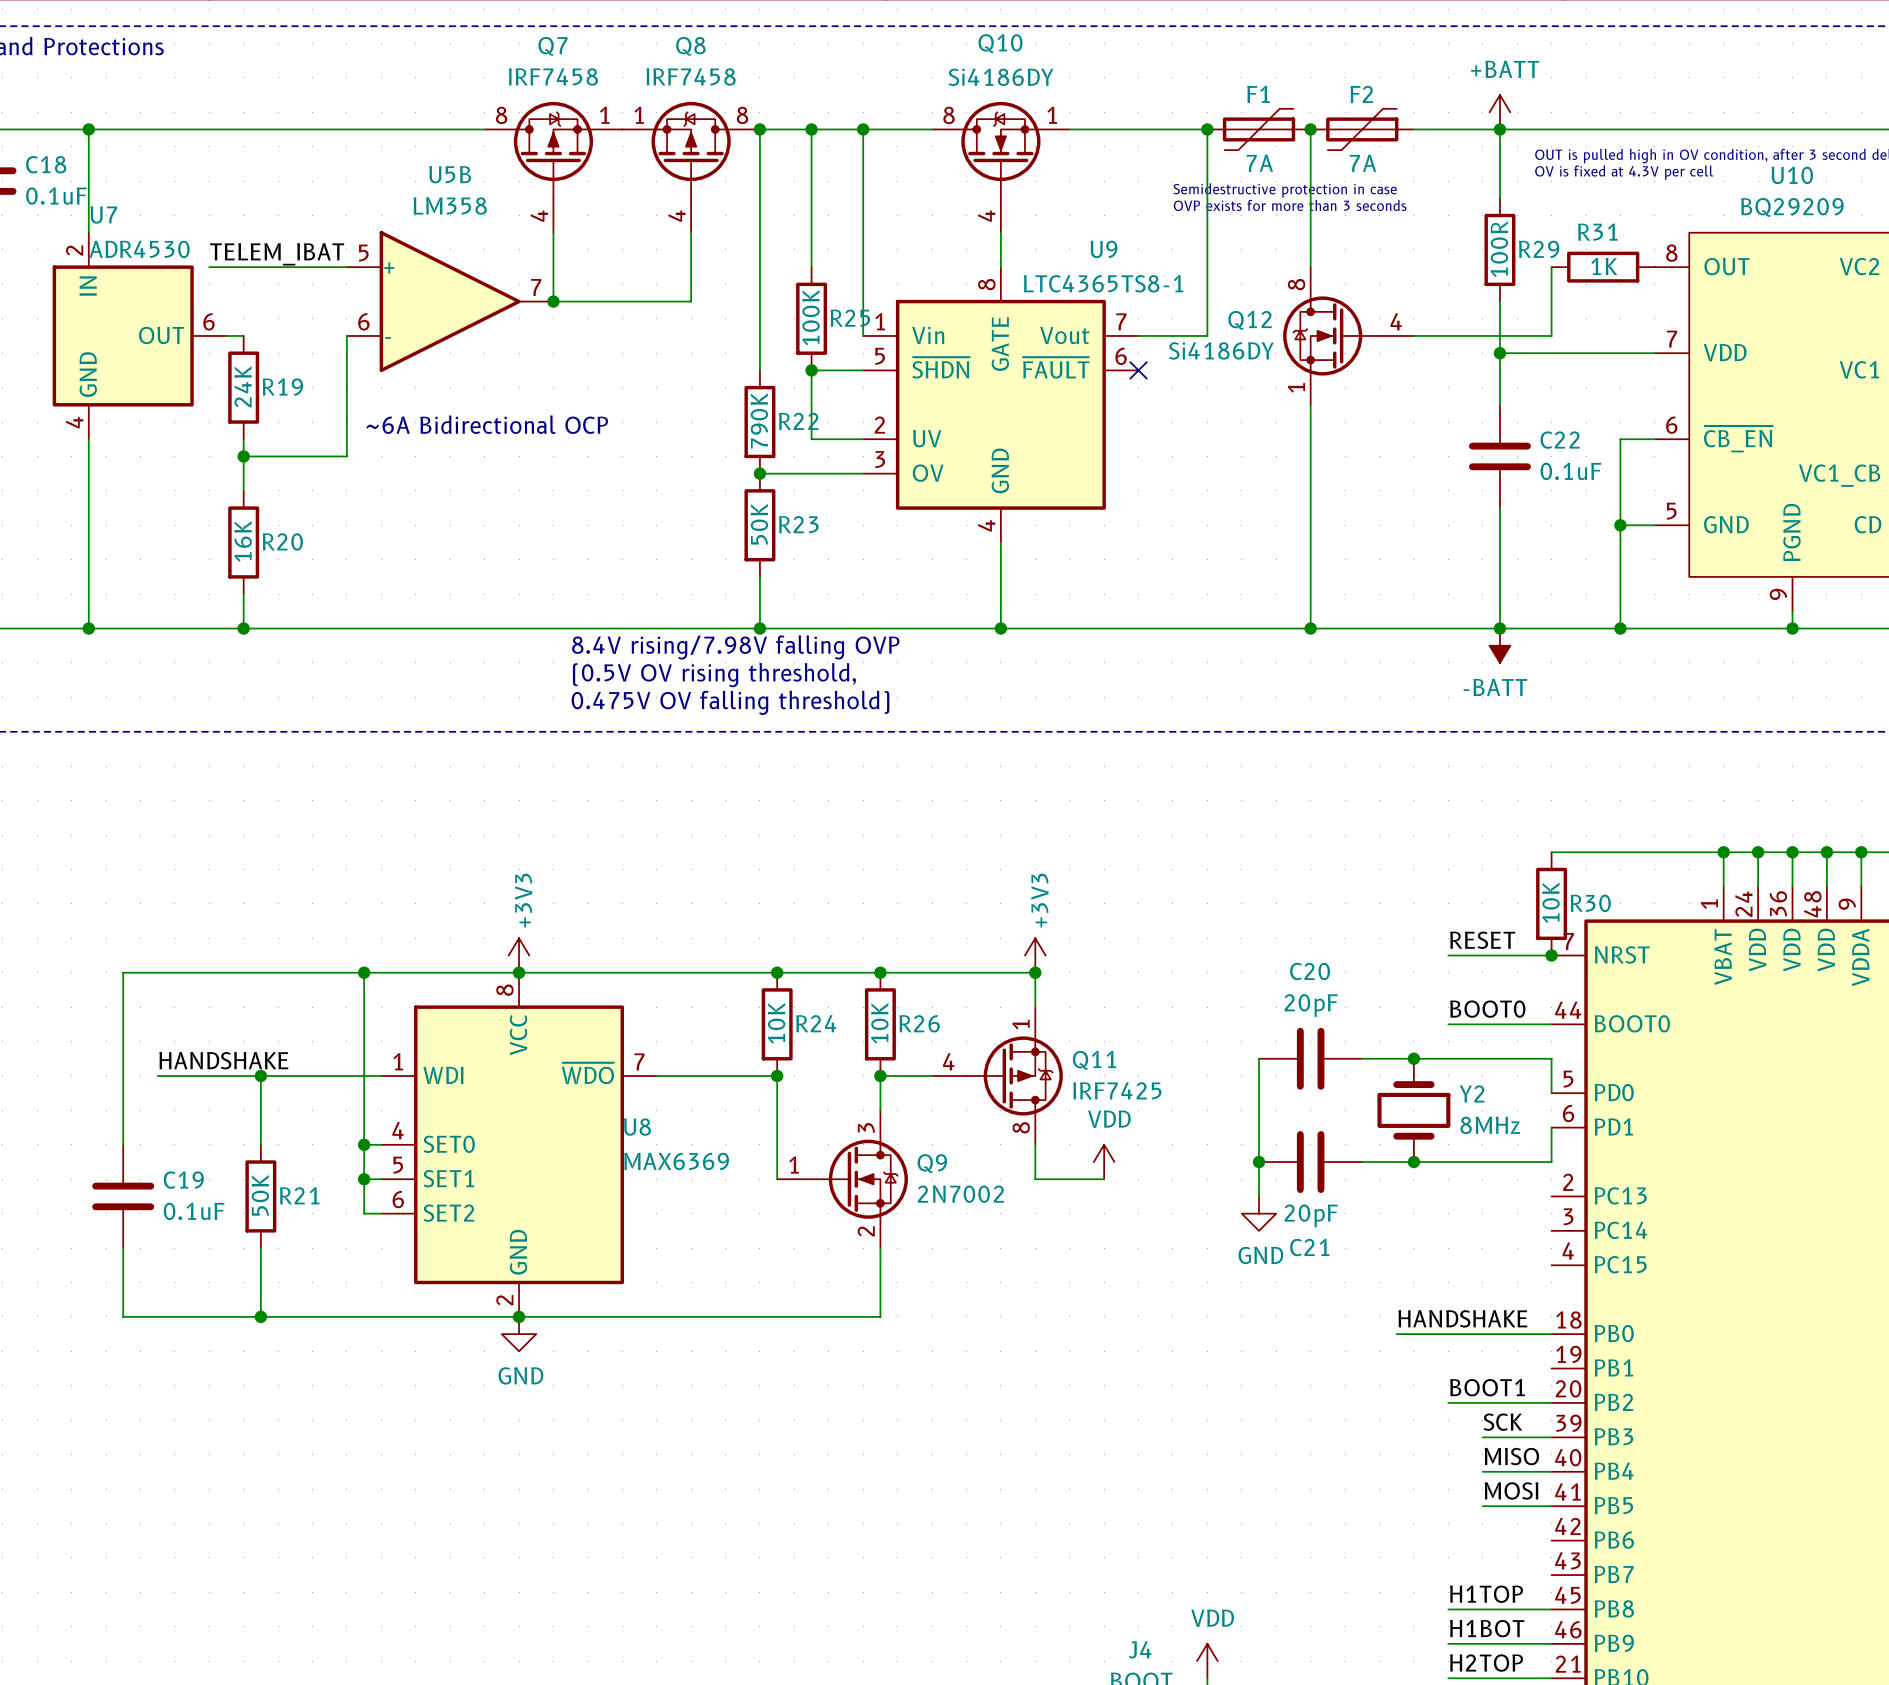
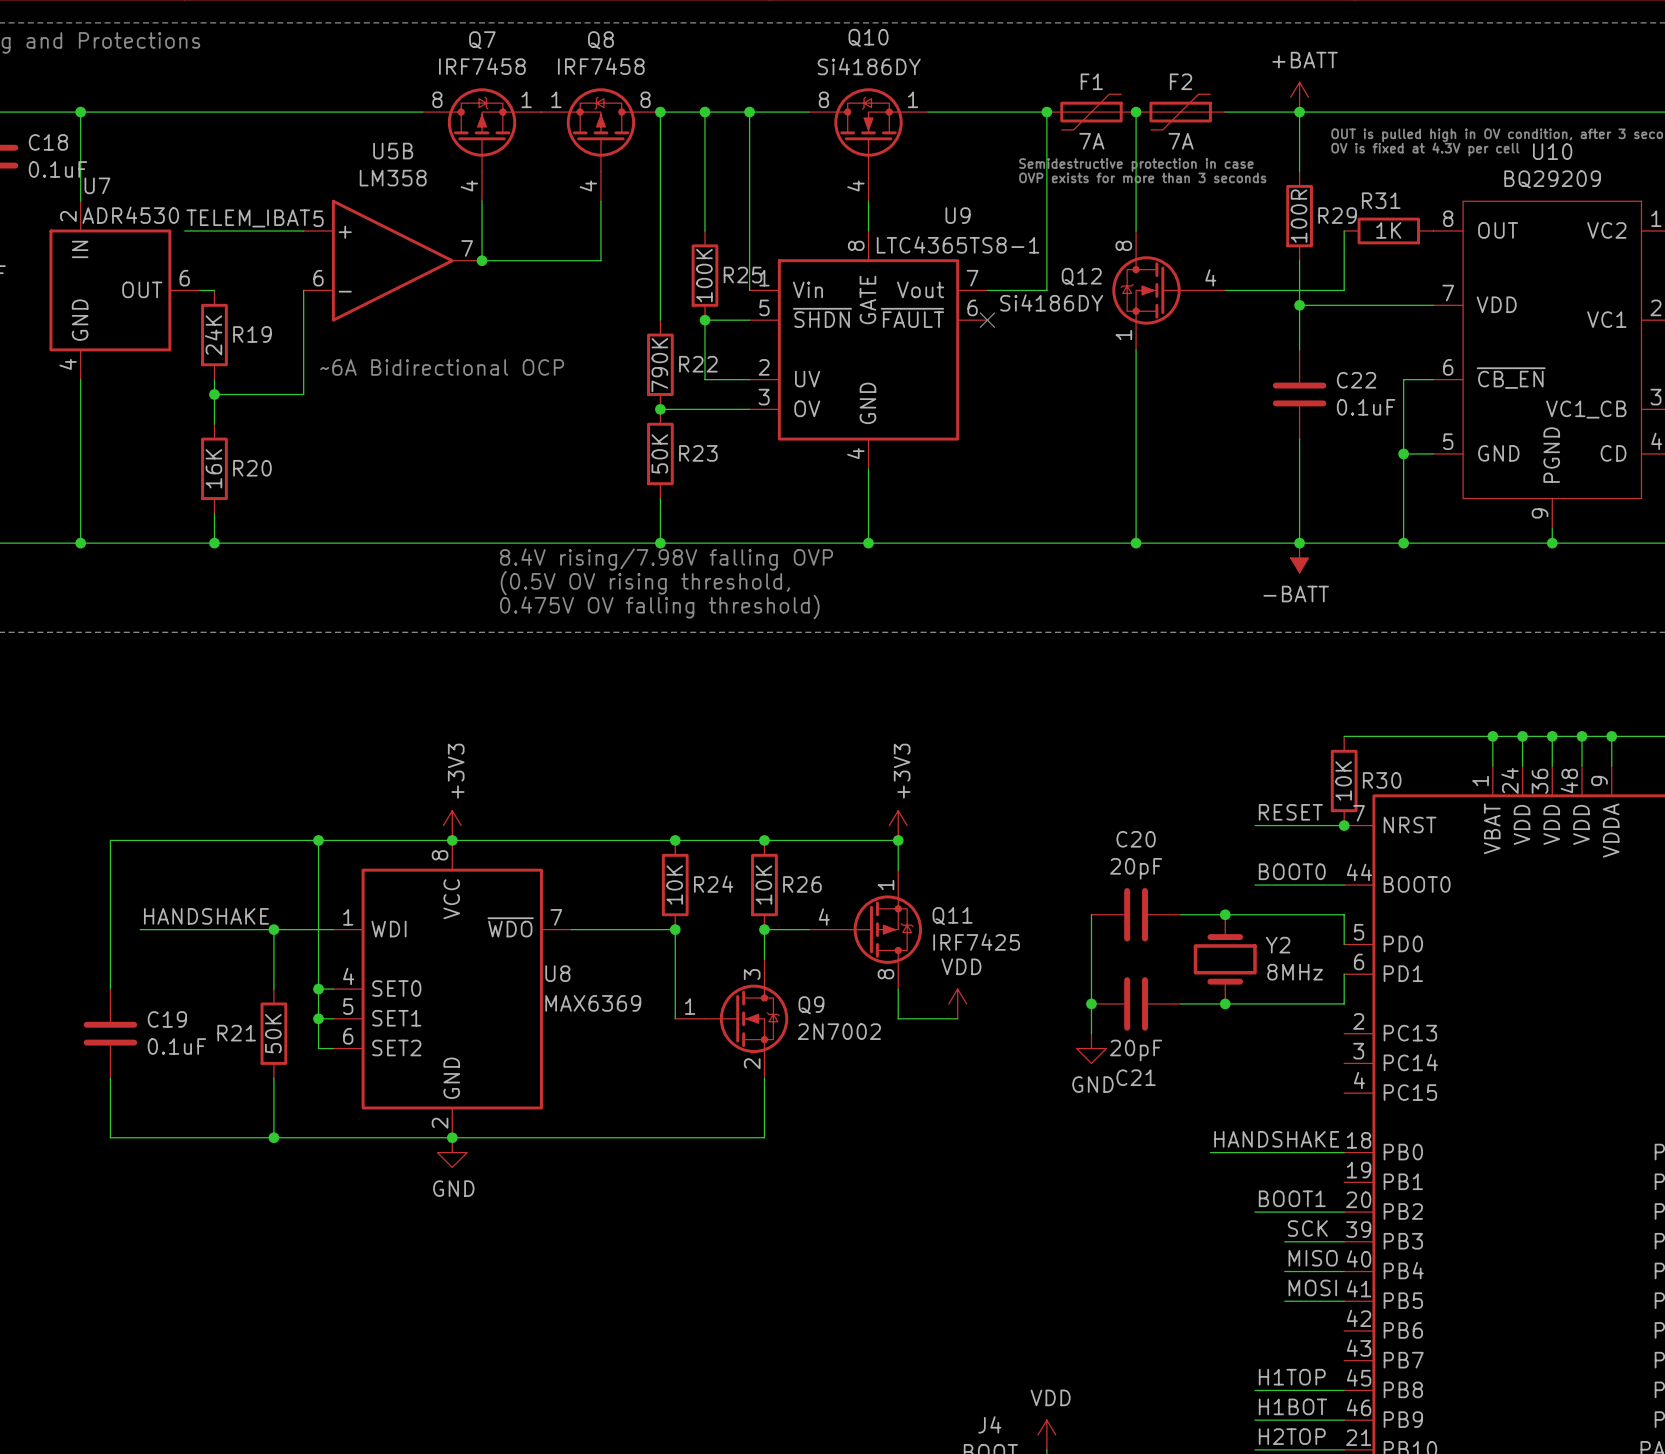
wire: (260, 1075) (260, 1144) -> (273, 929) (273, 989)
junction position: (260, 1075) -> (273, 929)
R21 name position: R21 (299, 1195) -> R21 (236, 1033)
R21 position: (260, 1196) -> (273, 1033)
wire: (260, 1248) (260, 1316) -> (273, 1078) (273, 1137)
junction position: (260, 1316) -> (273, 1137)

